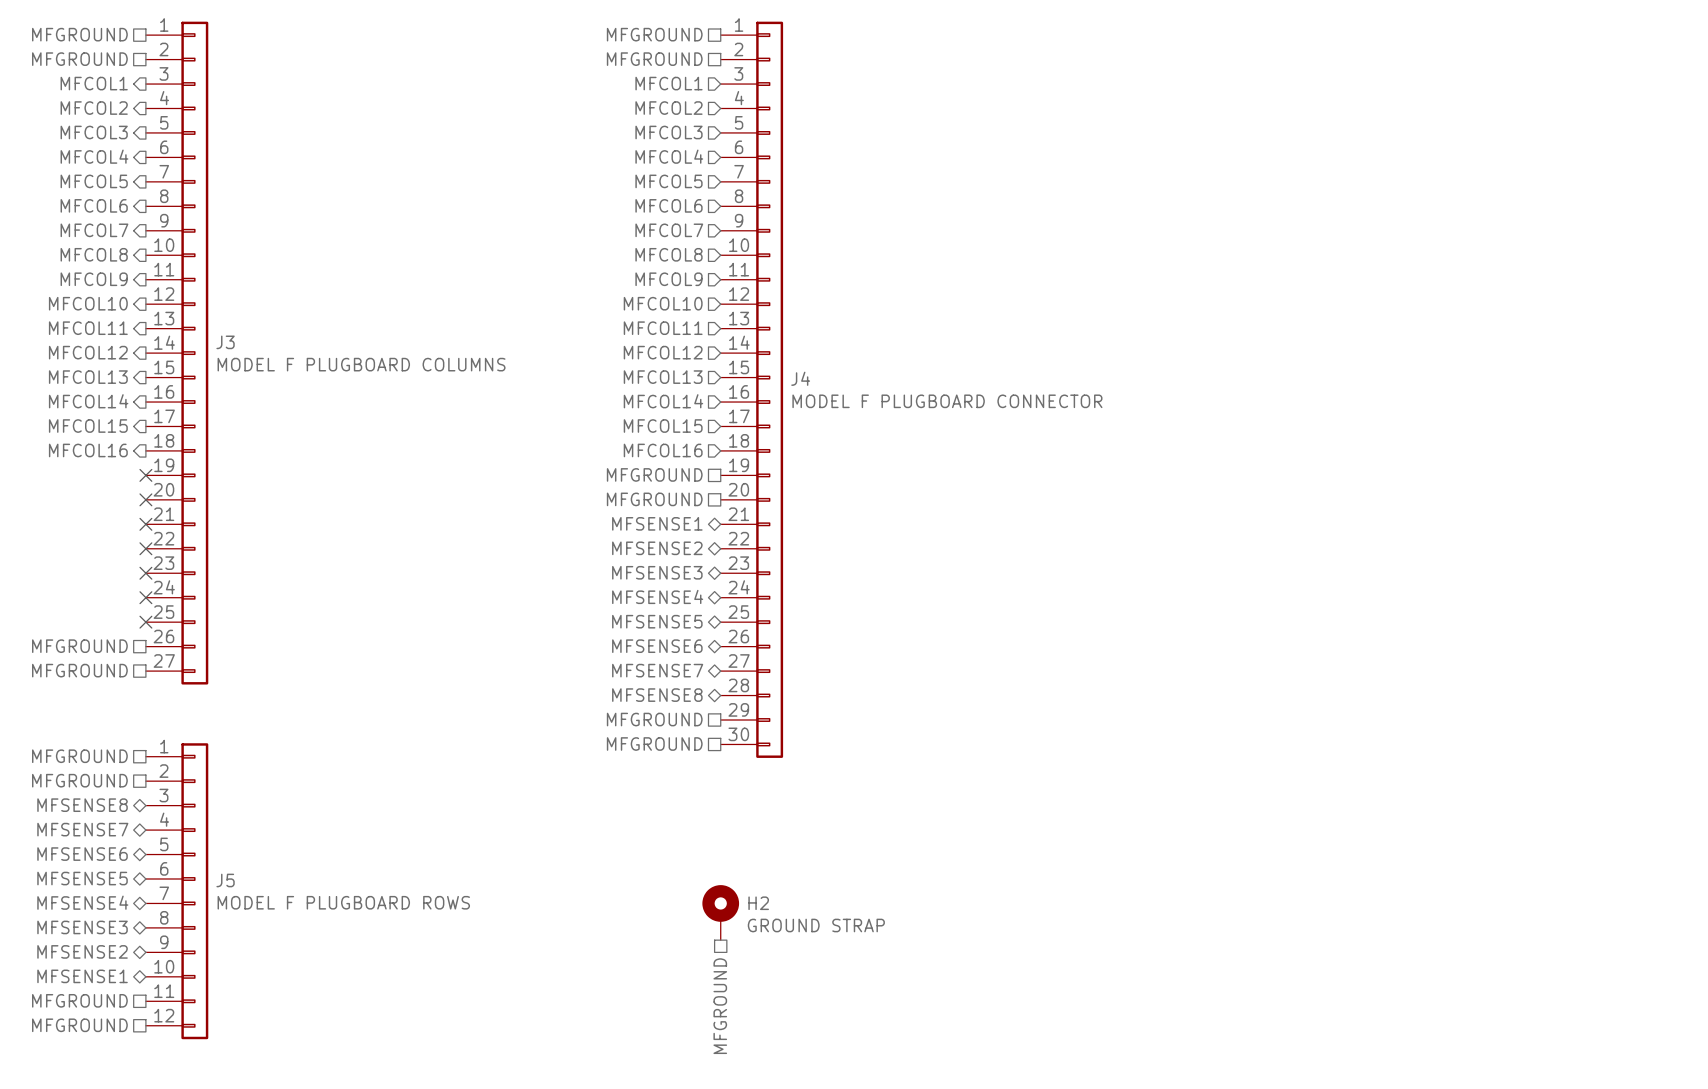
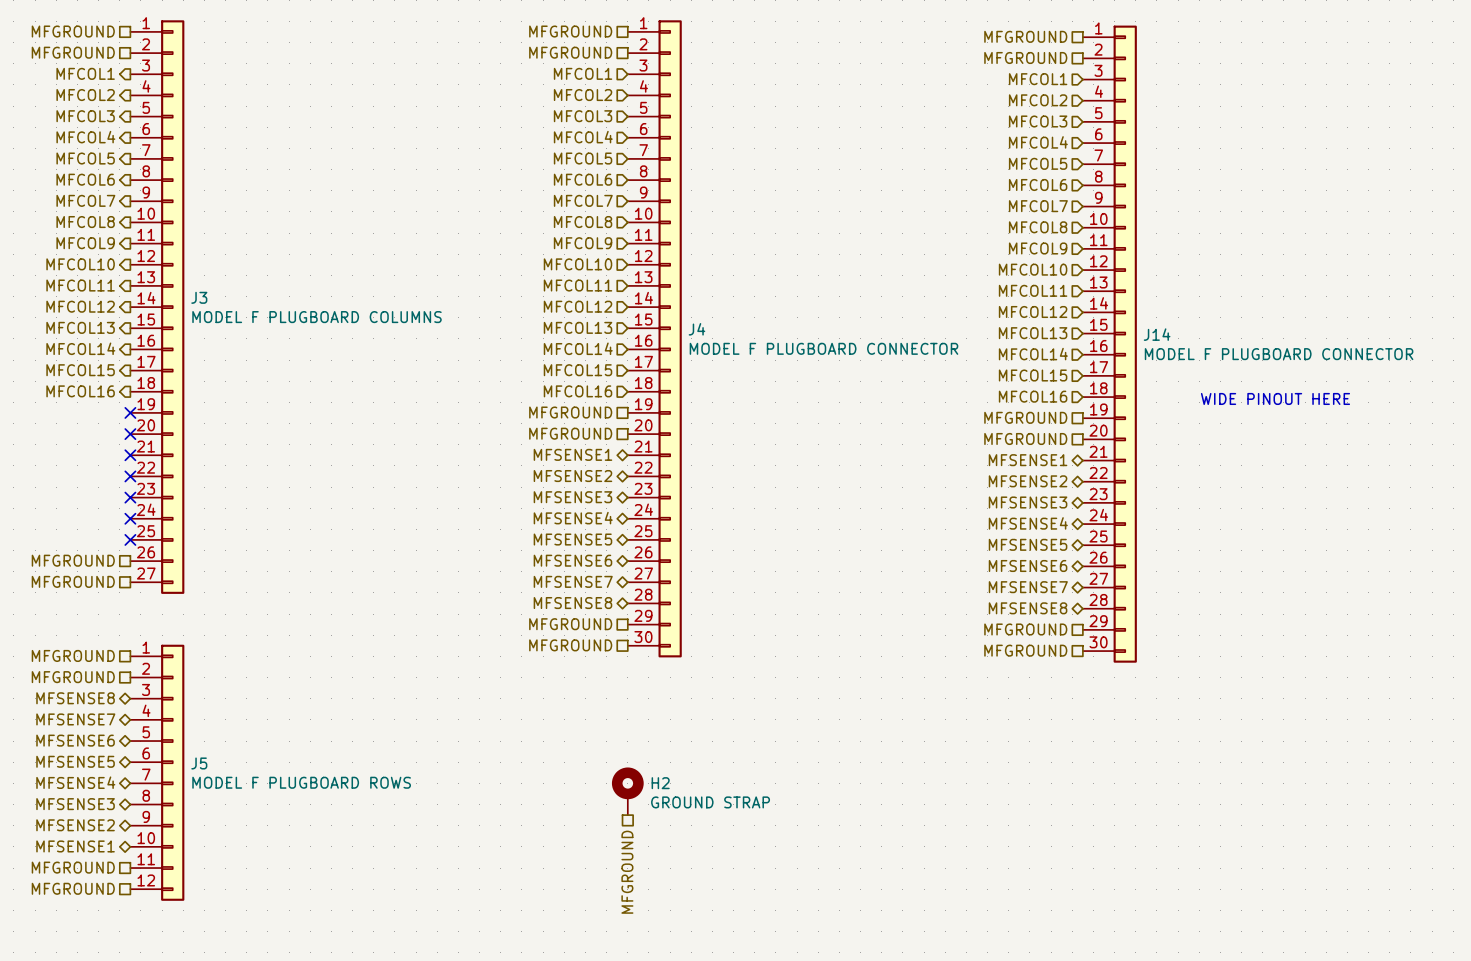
hierarchical label: none -> MFGROUND (1025, 36)
hierarchical label: none -> MFGROUND (1025, 57)
hierarchical label: none -> MFCOL1 (1038, 79)
hierarchical label: none -> MFCOL2 (1038, 100)
hierarchical label: none -> MFCOL3 (1038, 121)
hierarchical label: none -> MFCOL4 (1038, 142)
hierarchical label: none -> MFCOL5 (1038, 163)
hierarchical label: none -> MFCOL6 (1038, 184)
hierarchical label: none -> MFCOL7 (1038, 206)
hierarchical label: none -> MFCOL8 (1038, 227)
hierarchical label: none -> MFCOL9 (1038, 248)
hierarchical label: none -> MFCOL10 (1033, 269)
hierarchical label: none -> MFCOL11 (1033, 290)
hierarchical label: none -> MFCOL12 (1033, 311)
hierarchical label: none -> MFCOL13 (1033, 333)
J14: none -> MODEL F PLUGBOARD CONNECTOR (1109, 344)
hierarchical label: none -> MFCOL14 (1033, 354)
hierarchical label: none -> MFCOL15 (1033, 375)
hierarchical label: none -> MFCOL16 (1033, 396)
text: none -> WIDE PINOUT HERE (1275, 398)
hierarchical label: none -> MFGROUND (1025, 417)
hierarchical label: none -> MFGROUND (1025, 438)
hierarchical label: none -> MFSENSE1 (1028, 460)
hierarchical label: none -> MFSENSE2 (1028, 481)
hierarchical label: none -> MFSENSE3 (1028, 502)
hierarchical label: none -> MFSENSE4 (1028, 523)
hierarchical label: none -> MFSENSE5 (1028, 544)
hierarchical label: none -> MFSENSE6 (1028, 565)
hierarchical label: none -> MFSENSE7 (1028, 587)
hierarchical label: none -> MFSENSE8 (1028, 608)
hierarchical label: none -> MFGROUND (1025, 629)
hierarchical label: none -> MFGROUND (1025, 650)

